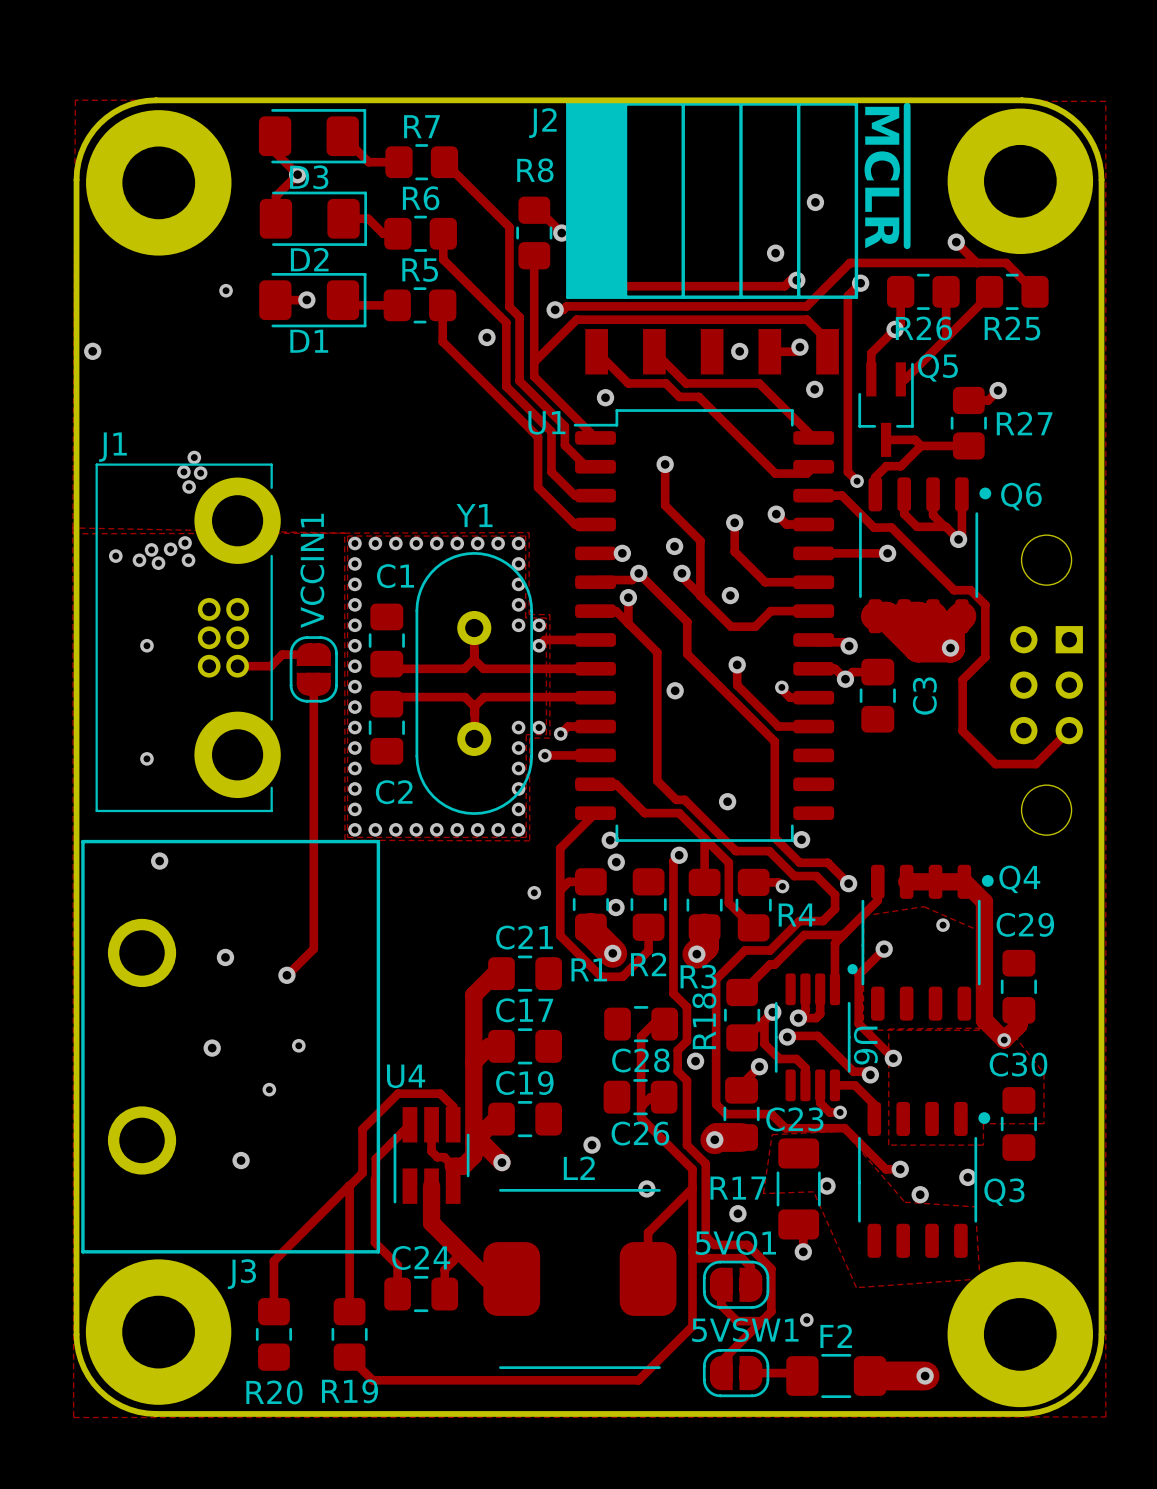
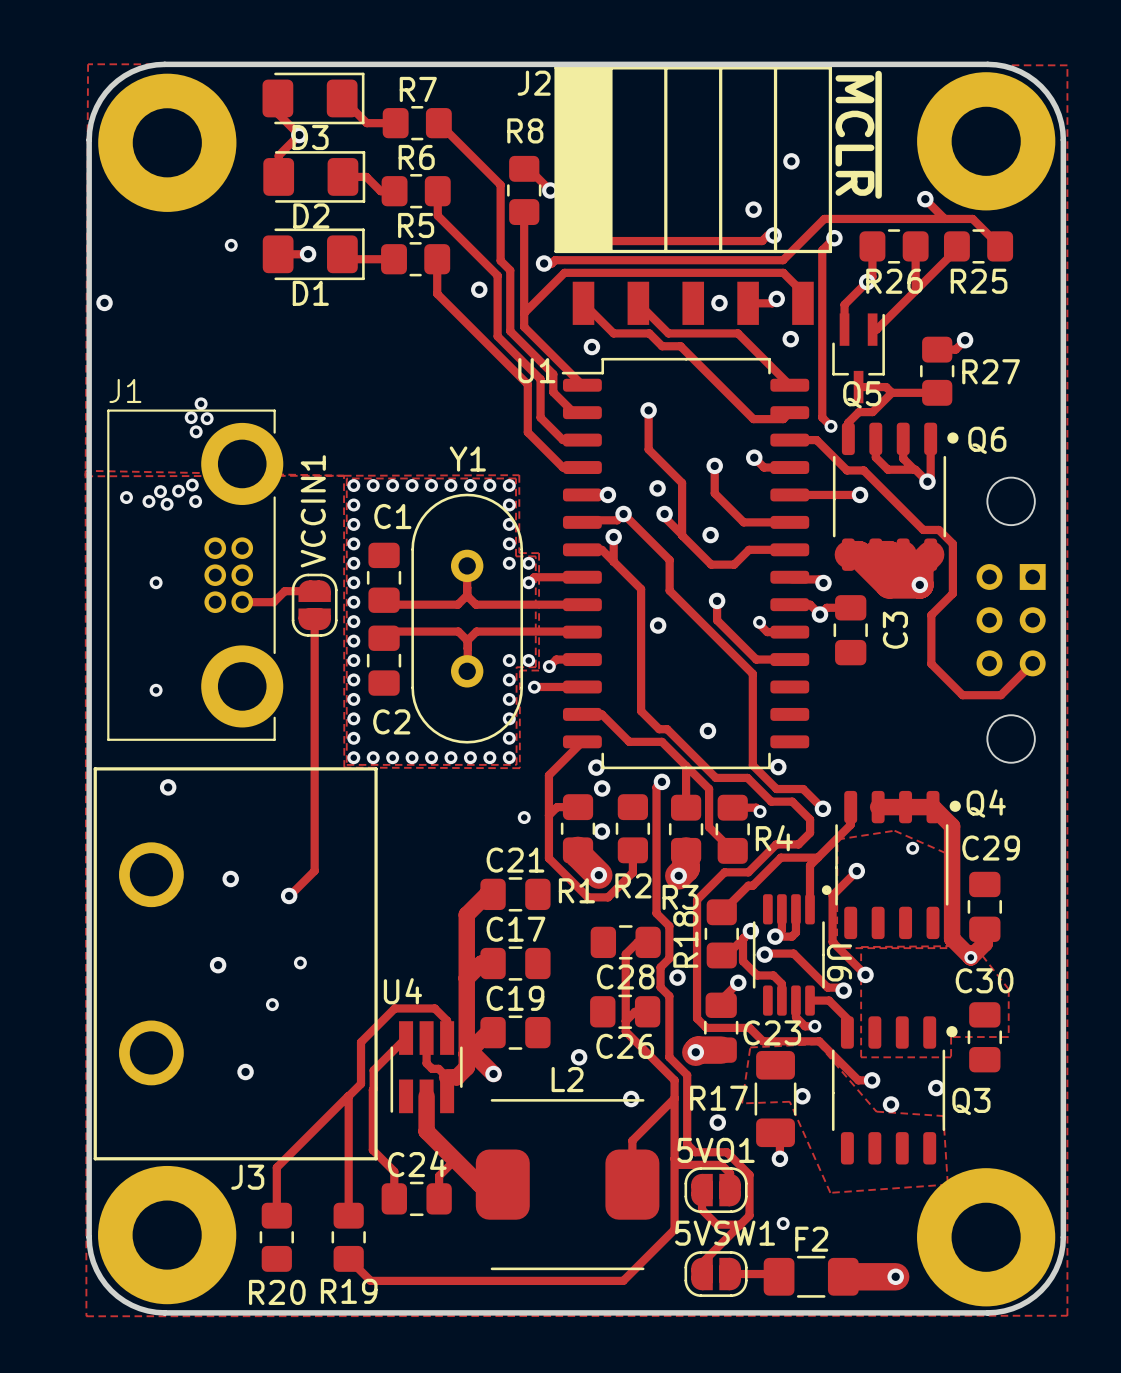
Q5 name position: Q5 (937, 367) -> Q5 (862, 394)

